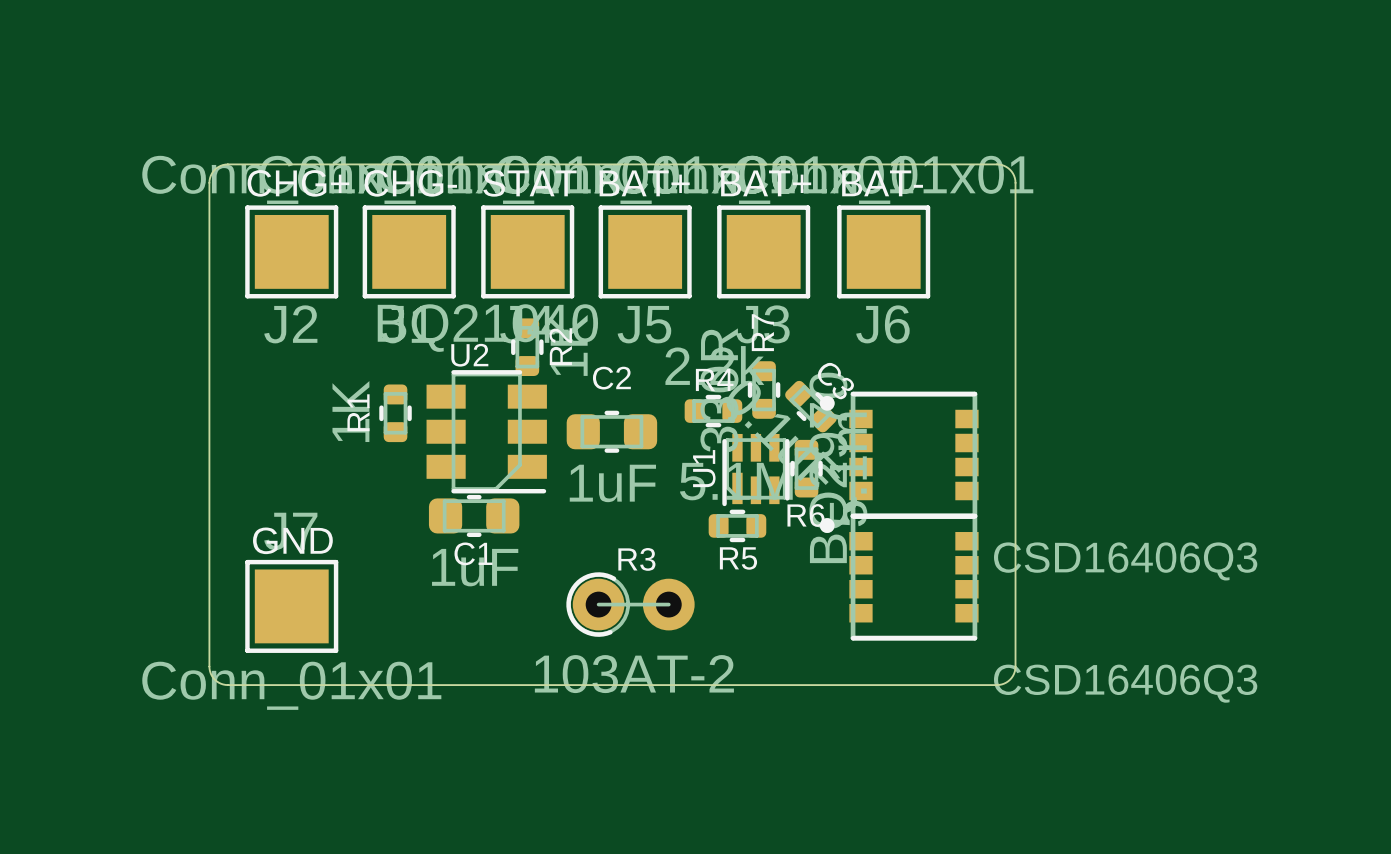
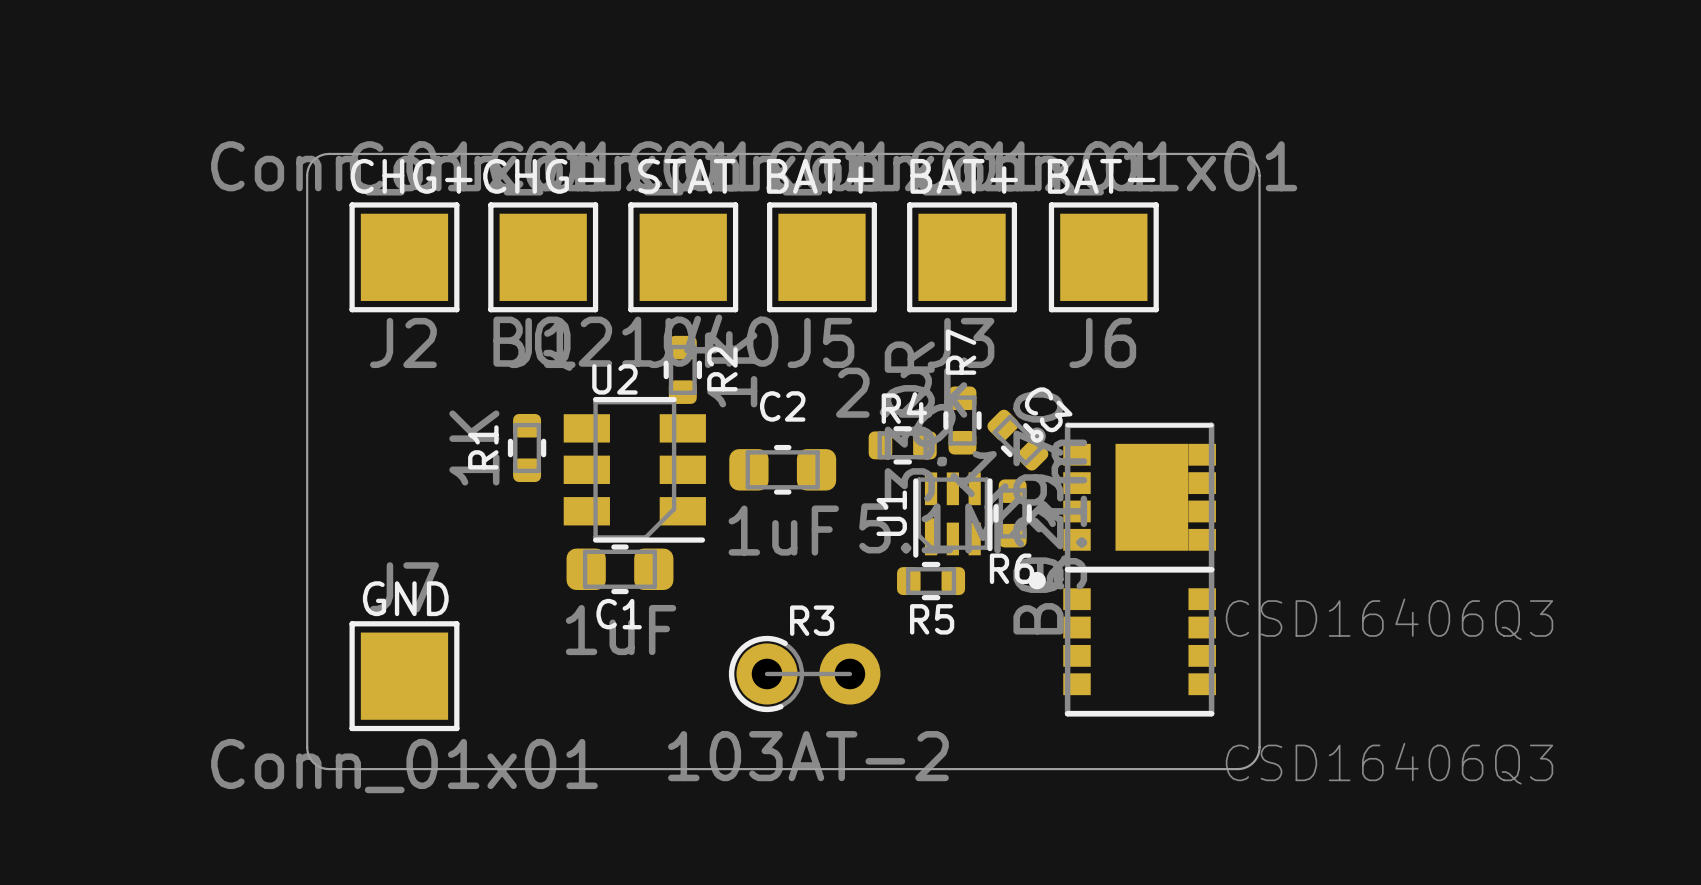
part footprint: [819, 391, 979, 519] -> [1028, 422, 1216, 573]

